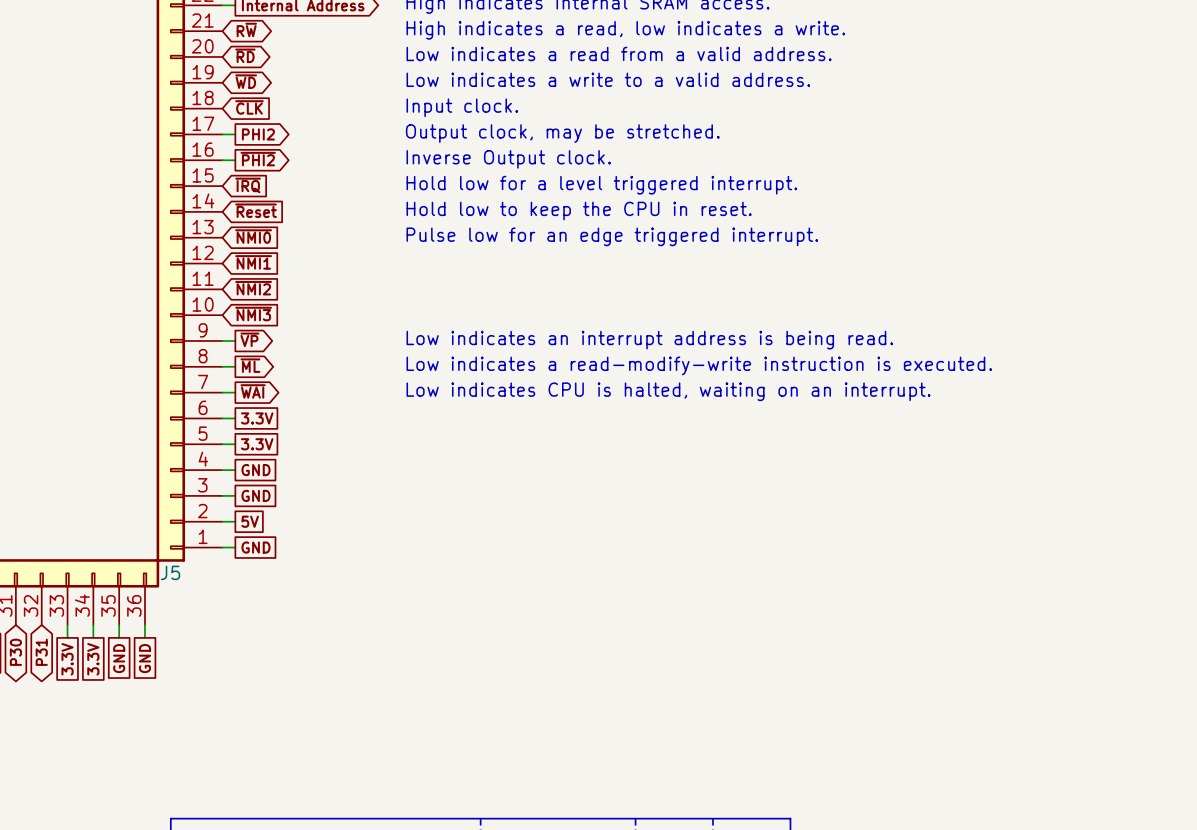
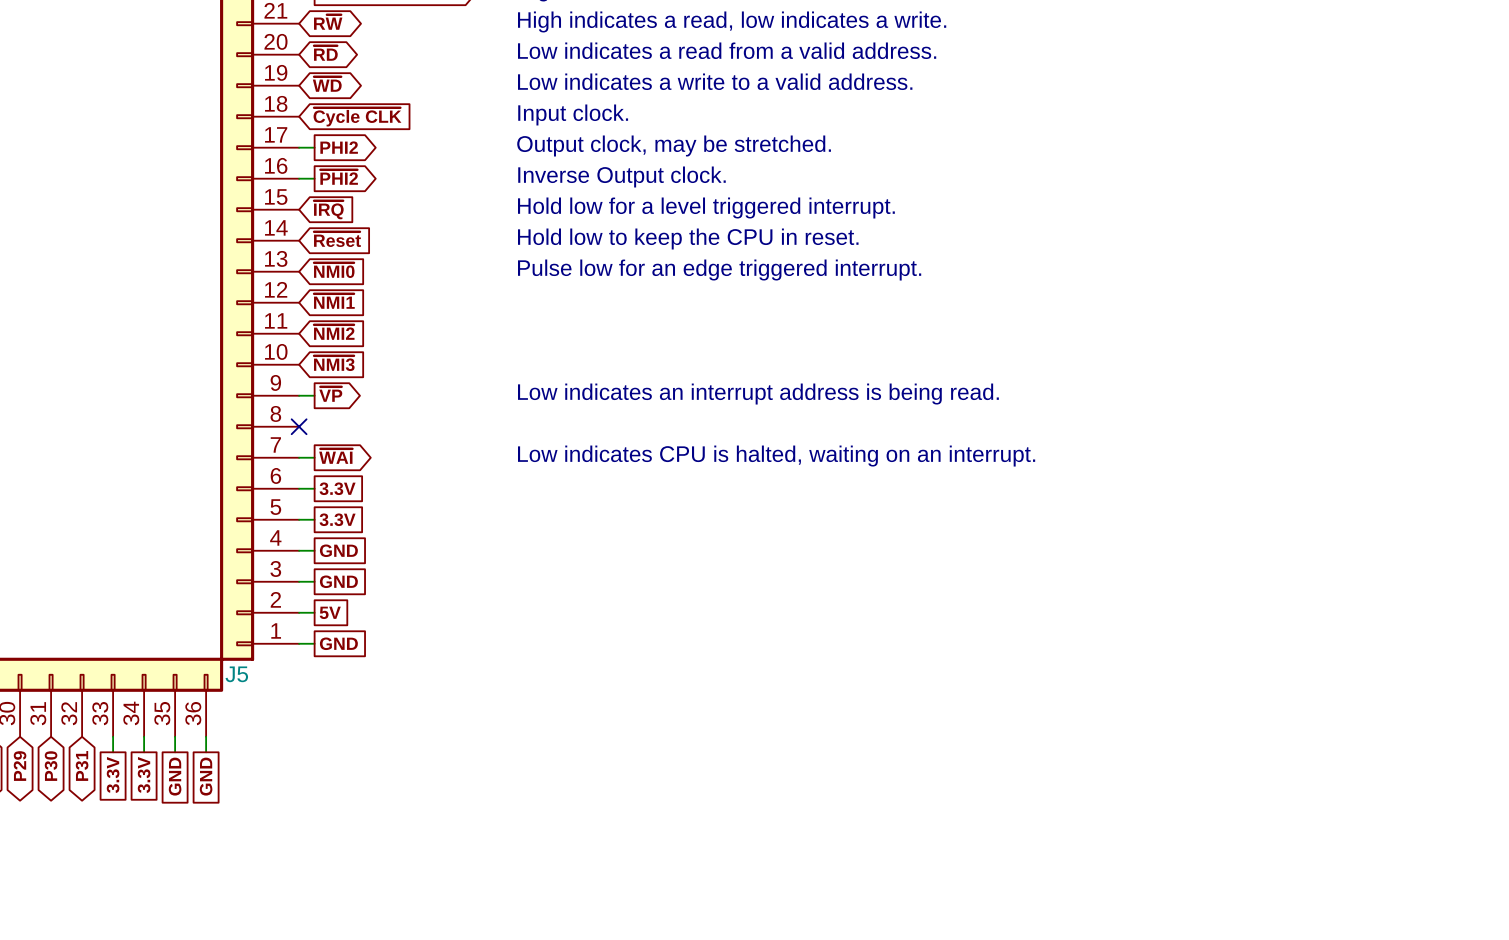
global label: ~{CLK} (249, 107) -> ~{Cycle CLK} (357, 117)
global label: ~{ML} (250, 365) -> none
text: Low indicates a read-modify-write instruction is executed. (699, 365) -> none
wire: (222, 366) (235, 366) -> none
no-connect mark: none -> (299, 426)

